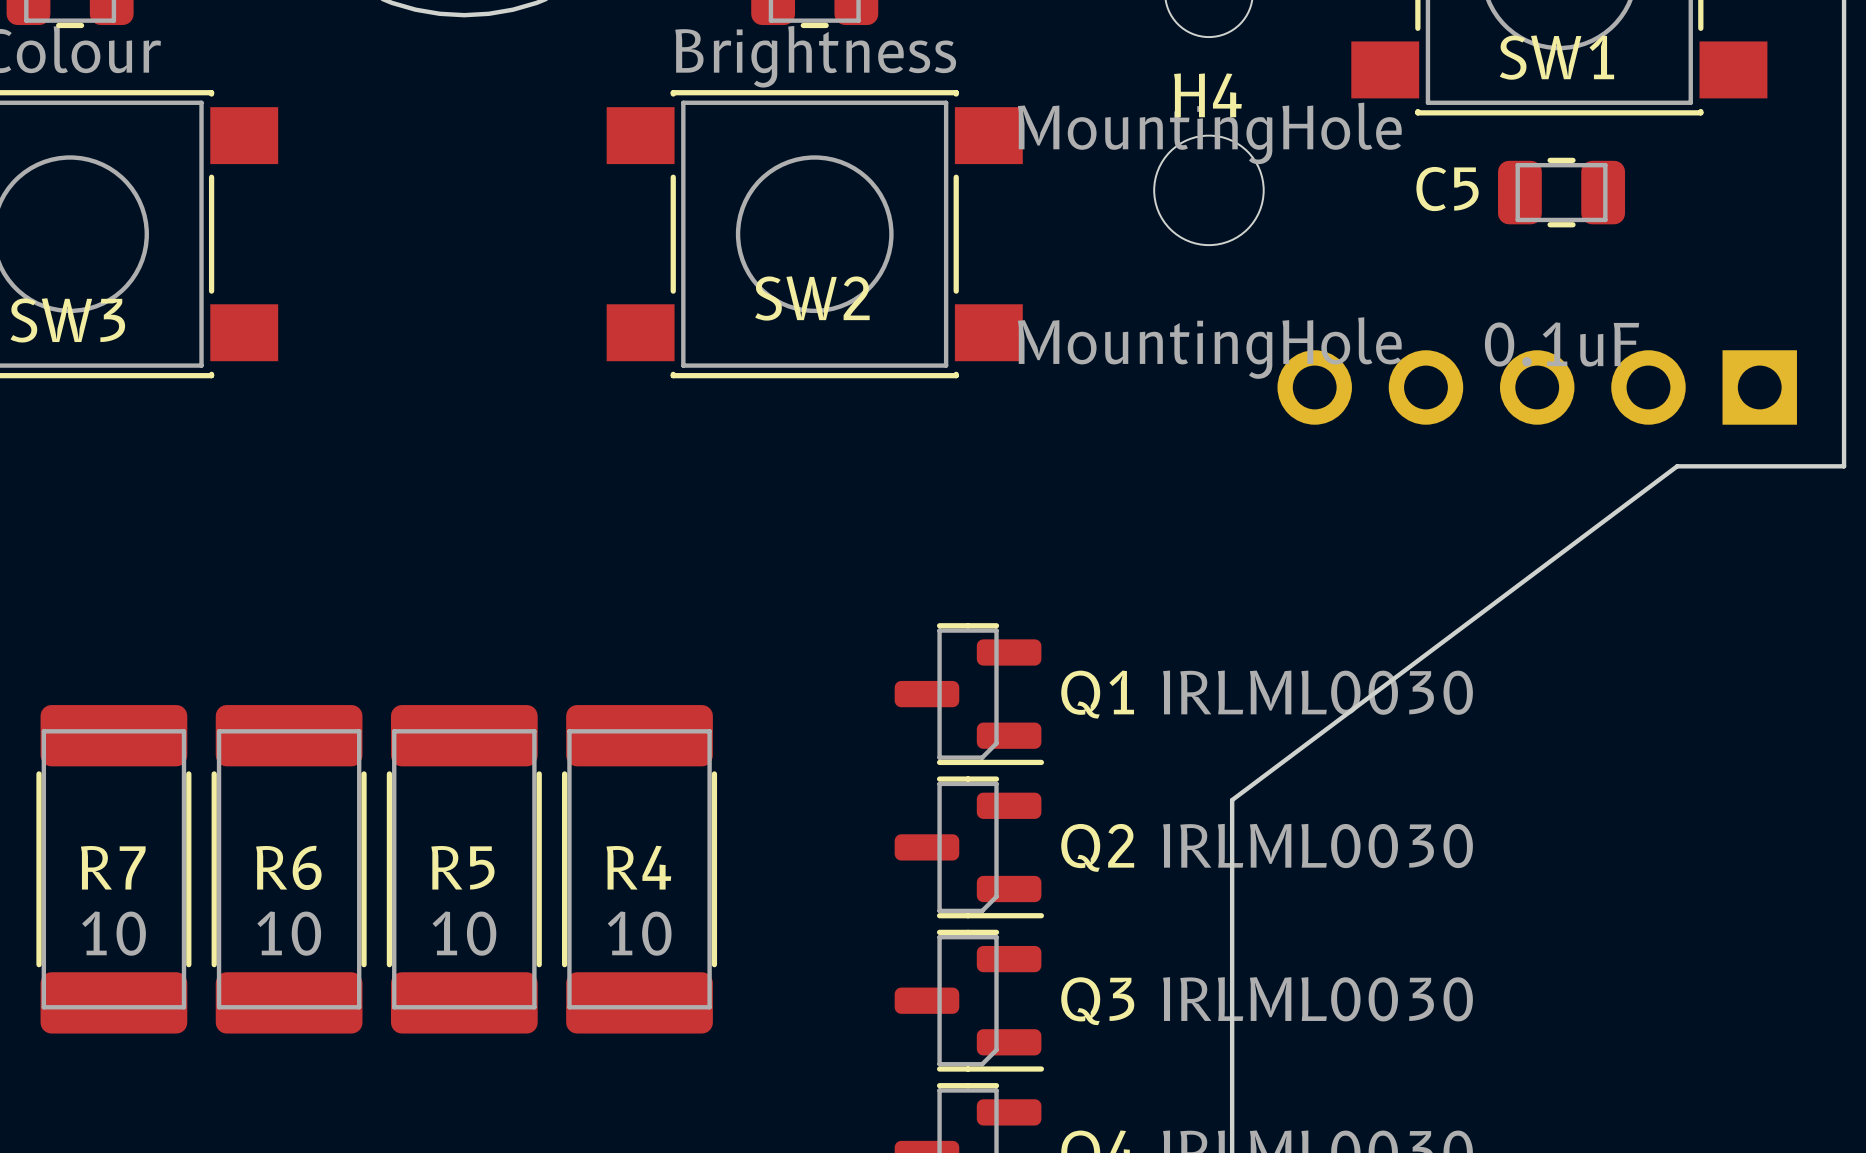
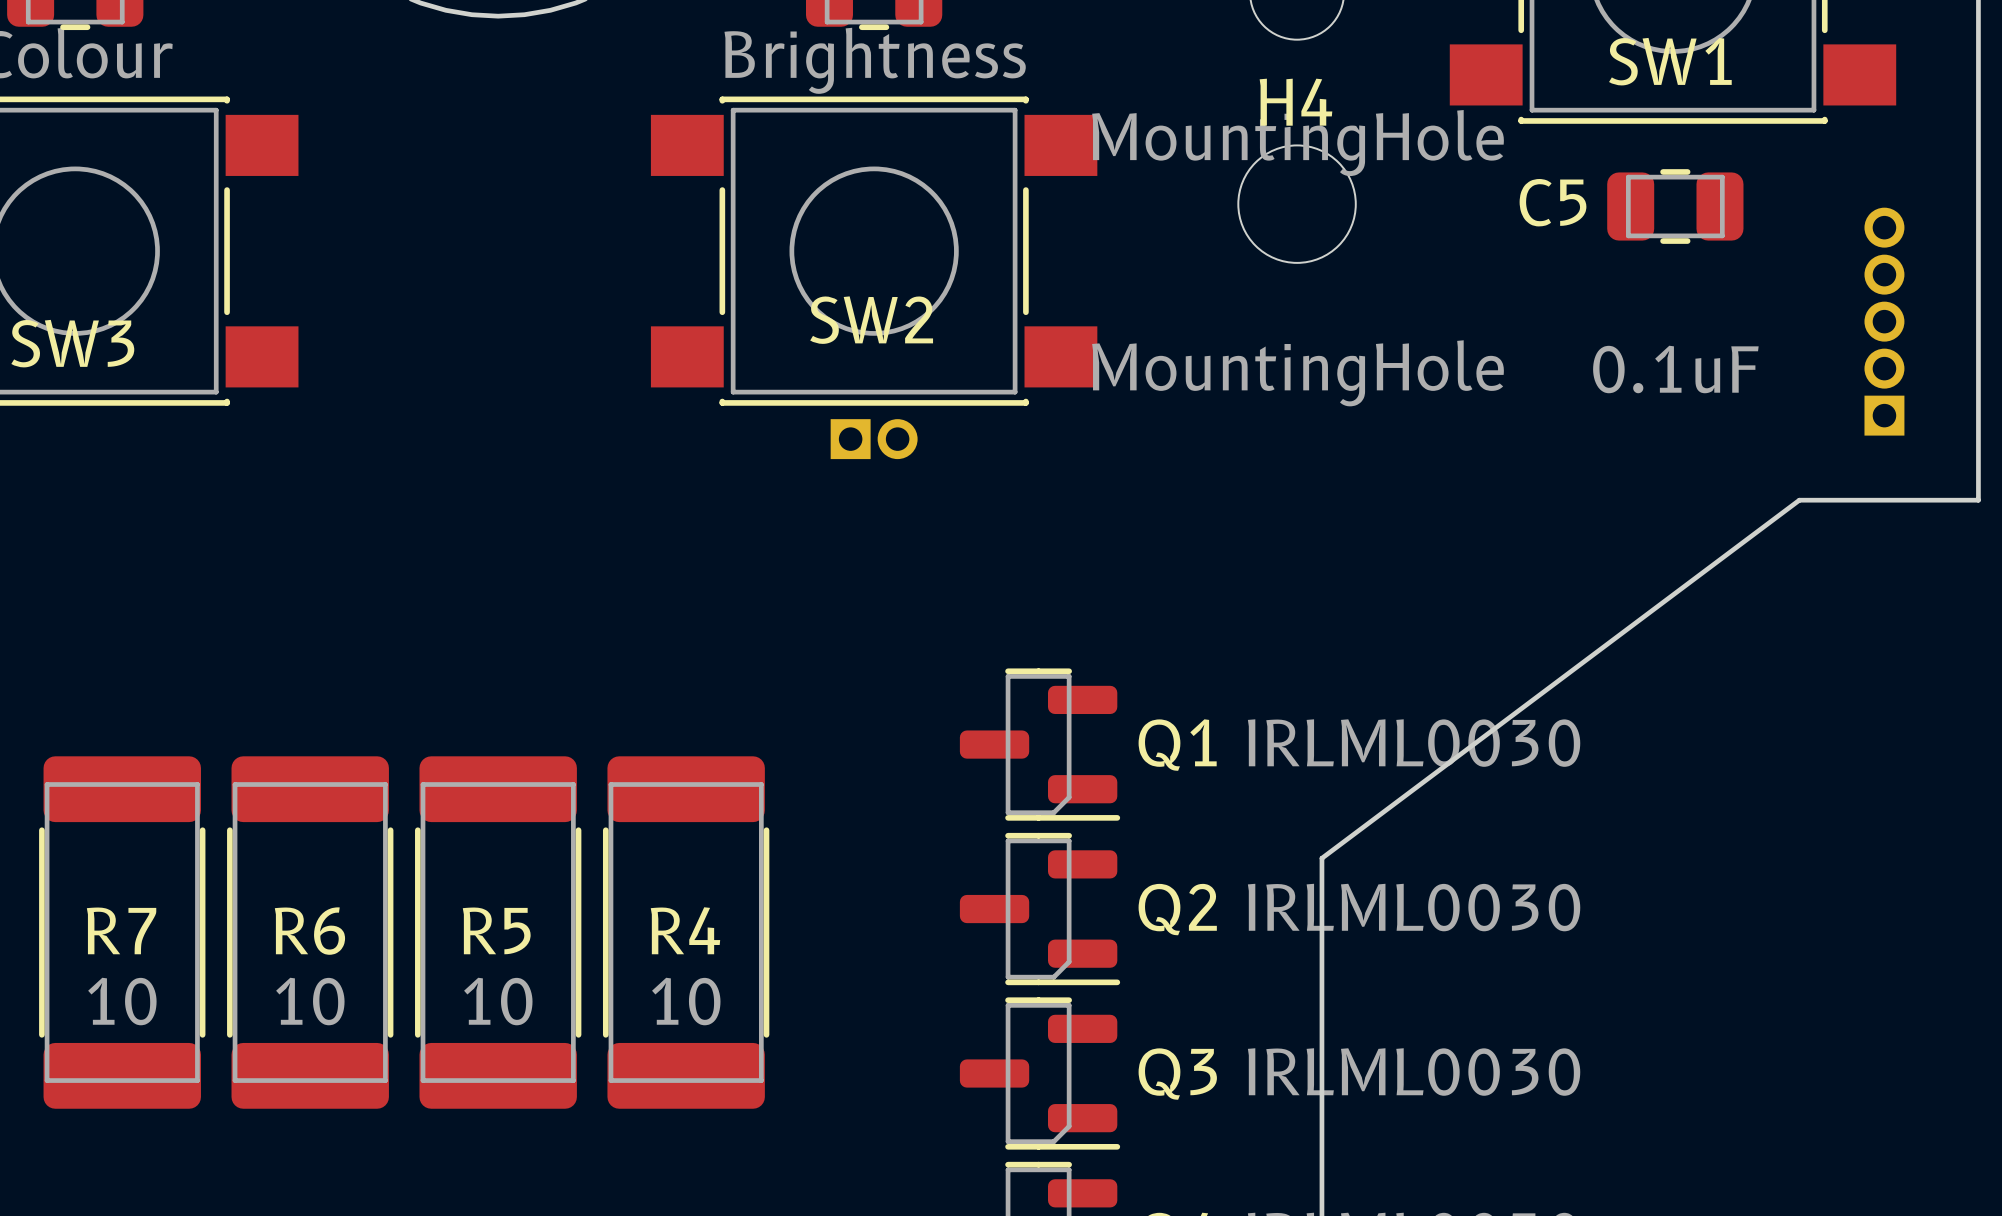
part: none -> (1884, 321)
part: (1537, 387) -> none
part: none -> (874, 439)

